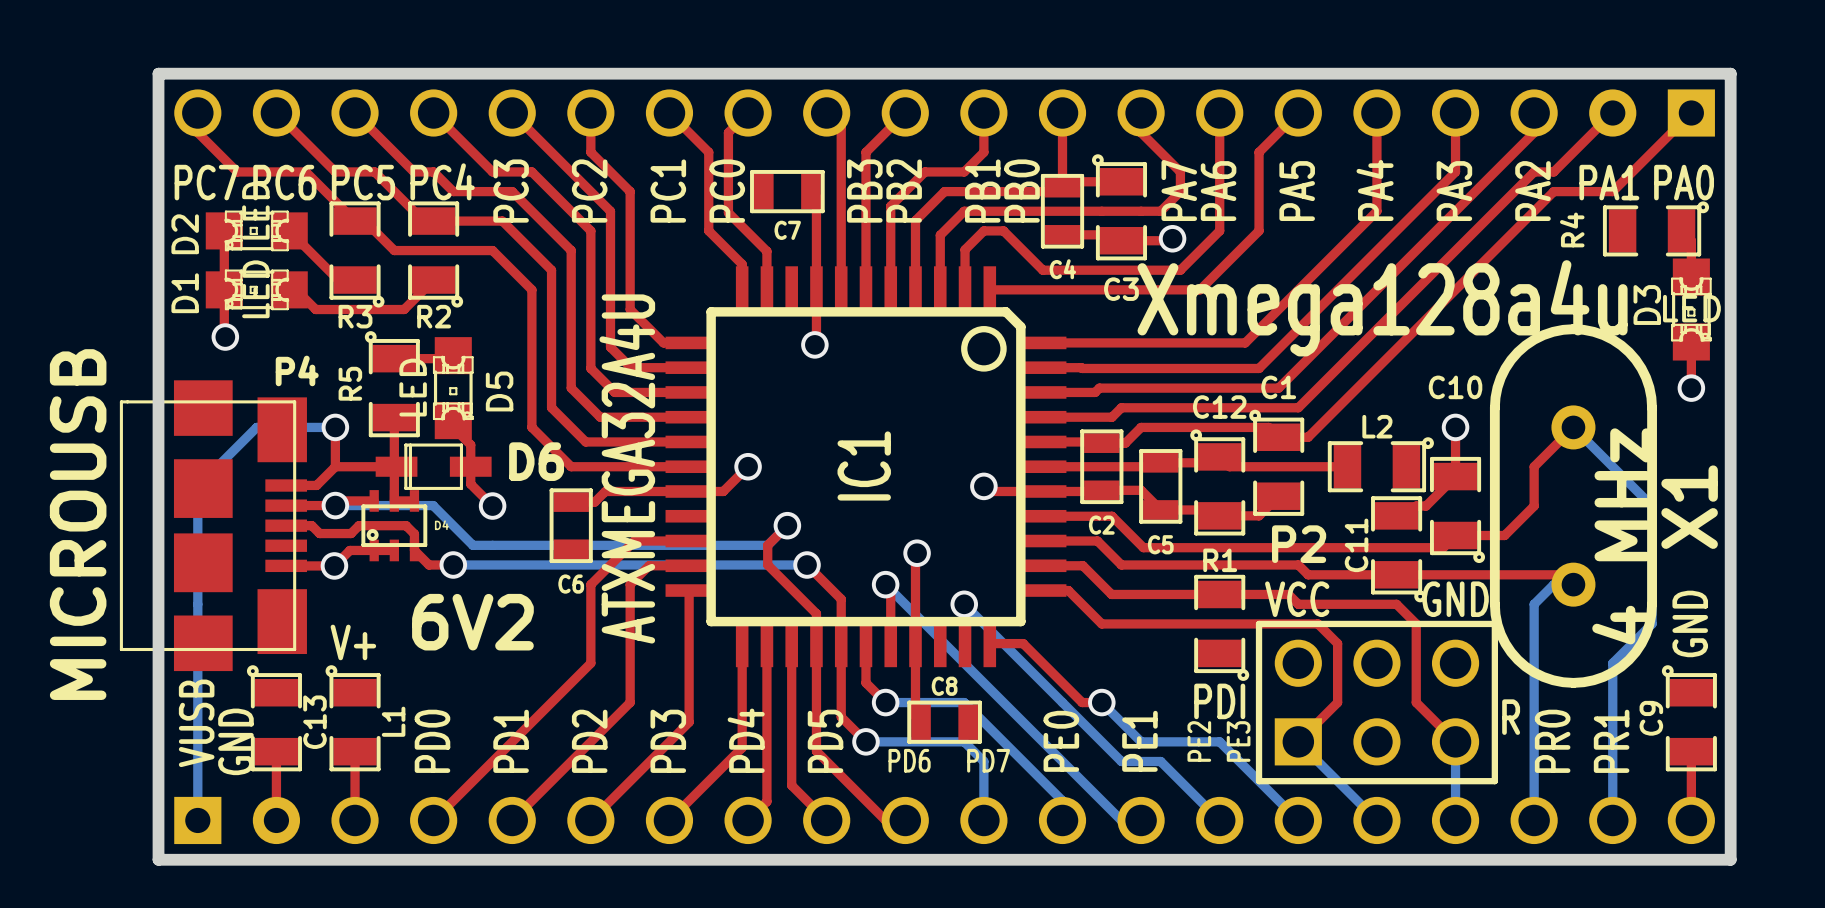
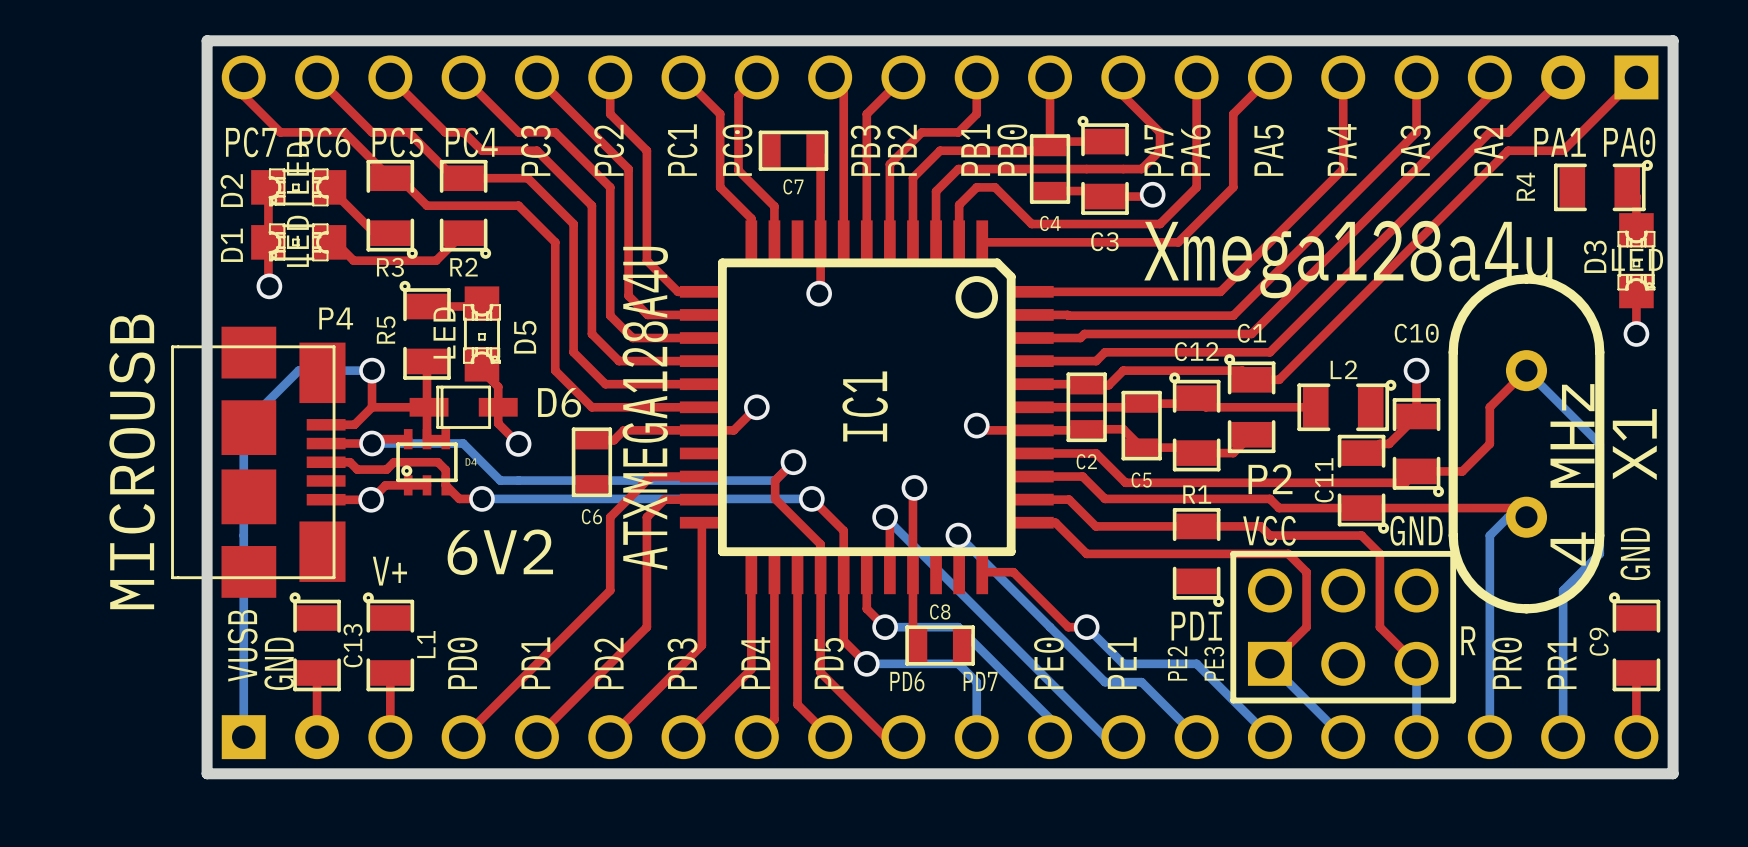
IC1 value: ATXMEGA32A4U (627, 468) -> ATXMEGA128A4U (645, 408)

